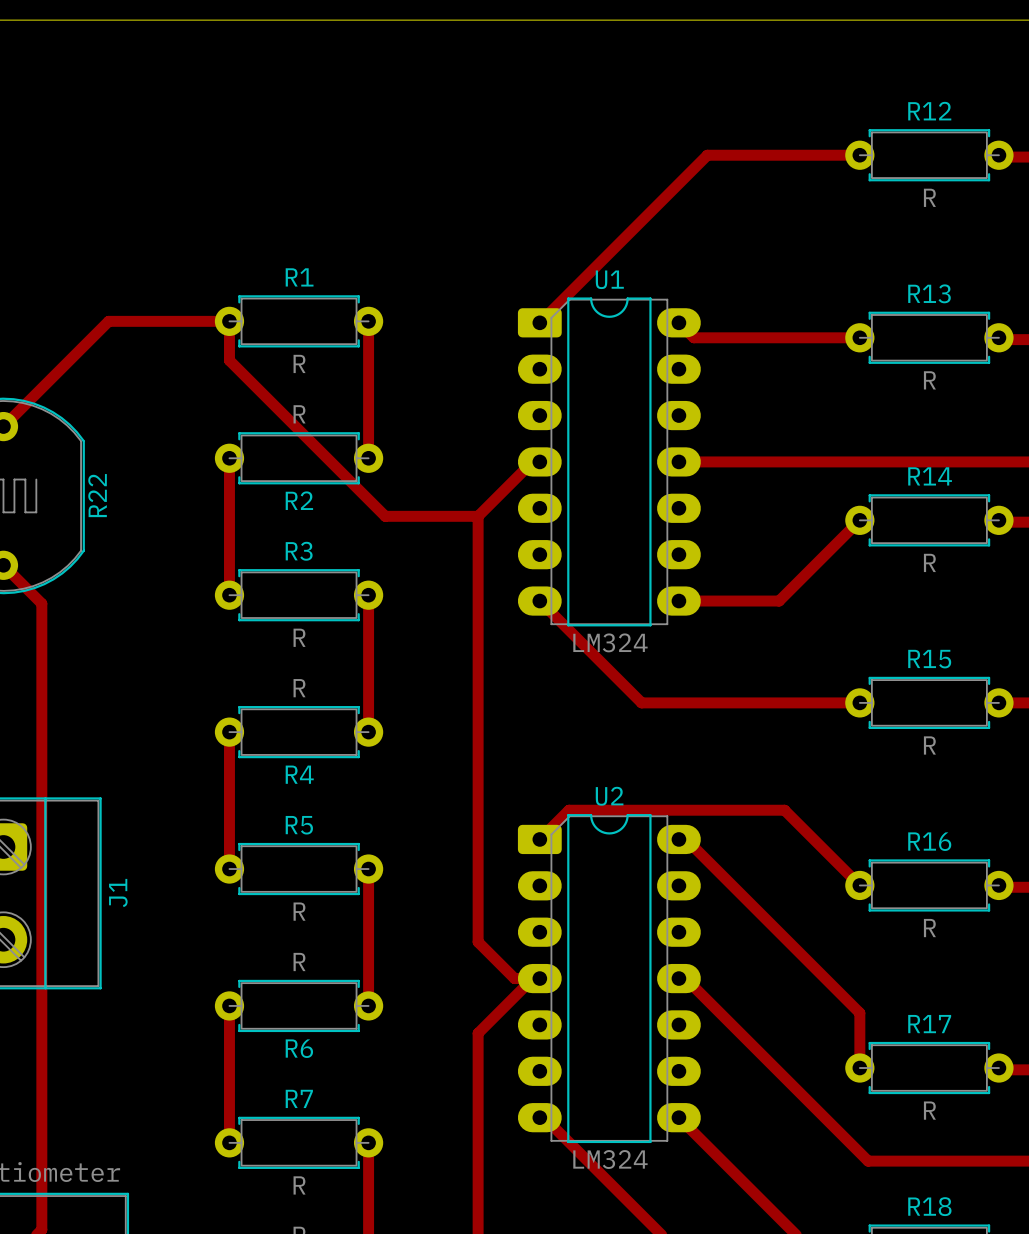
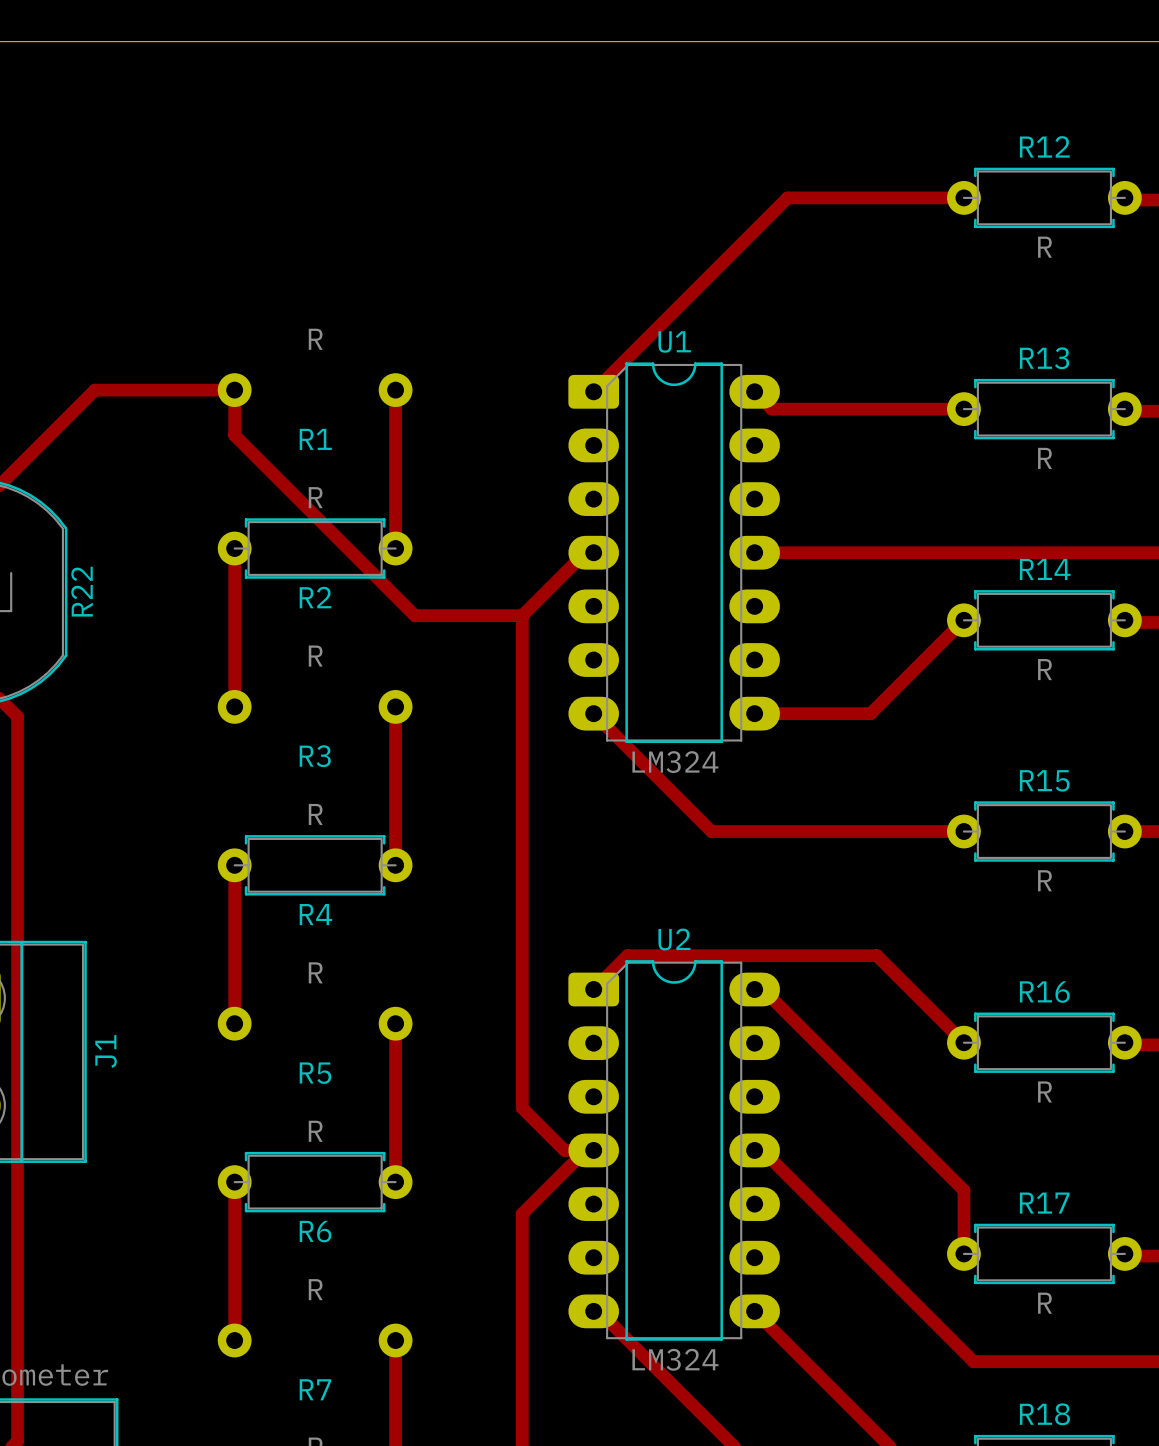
R1 side: top (299, 321) -> bottom (315, 390)
R3 side: top (299, 595) -> bottom (315, 706)
R5 side: top (299, 869) -> bottom (315, 1023)
R7 side: top (299, 1142) -> bottom (315, 1340)

